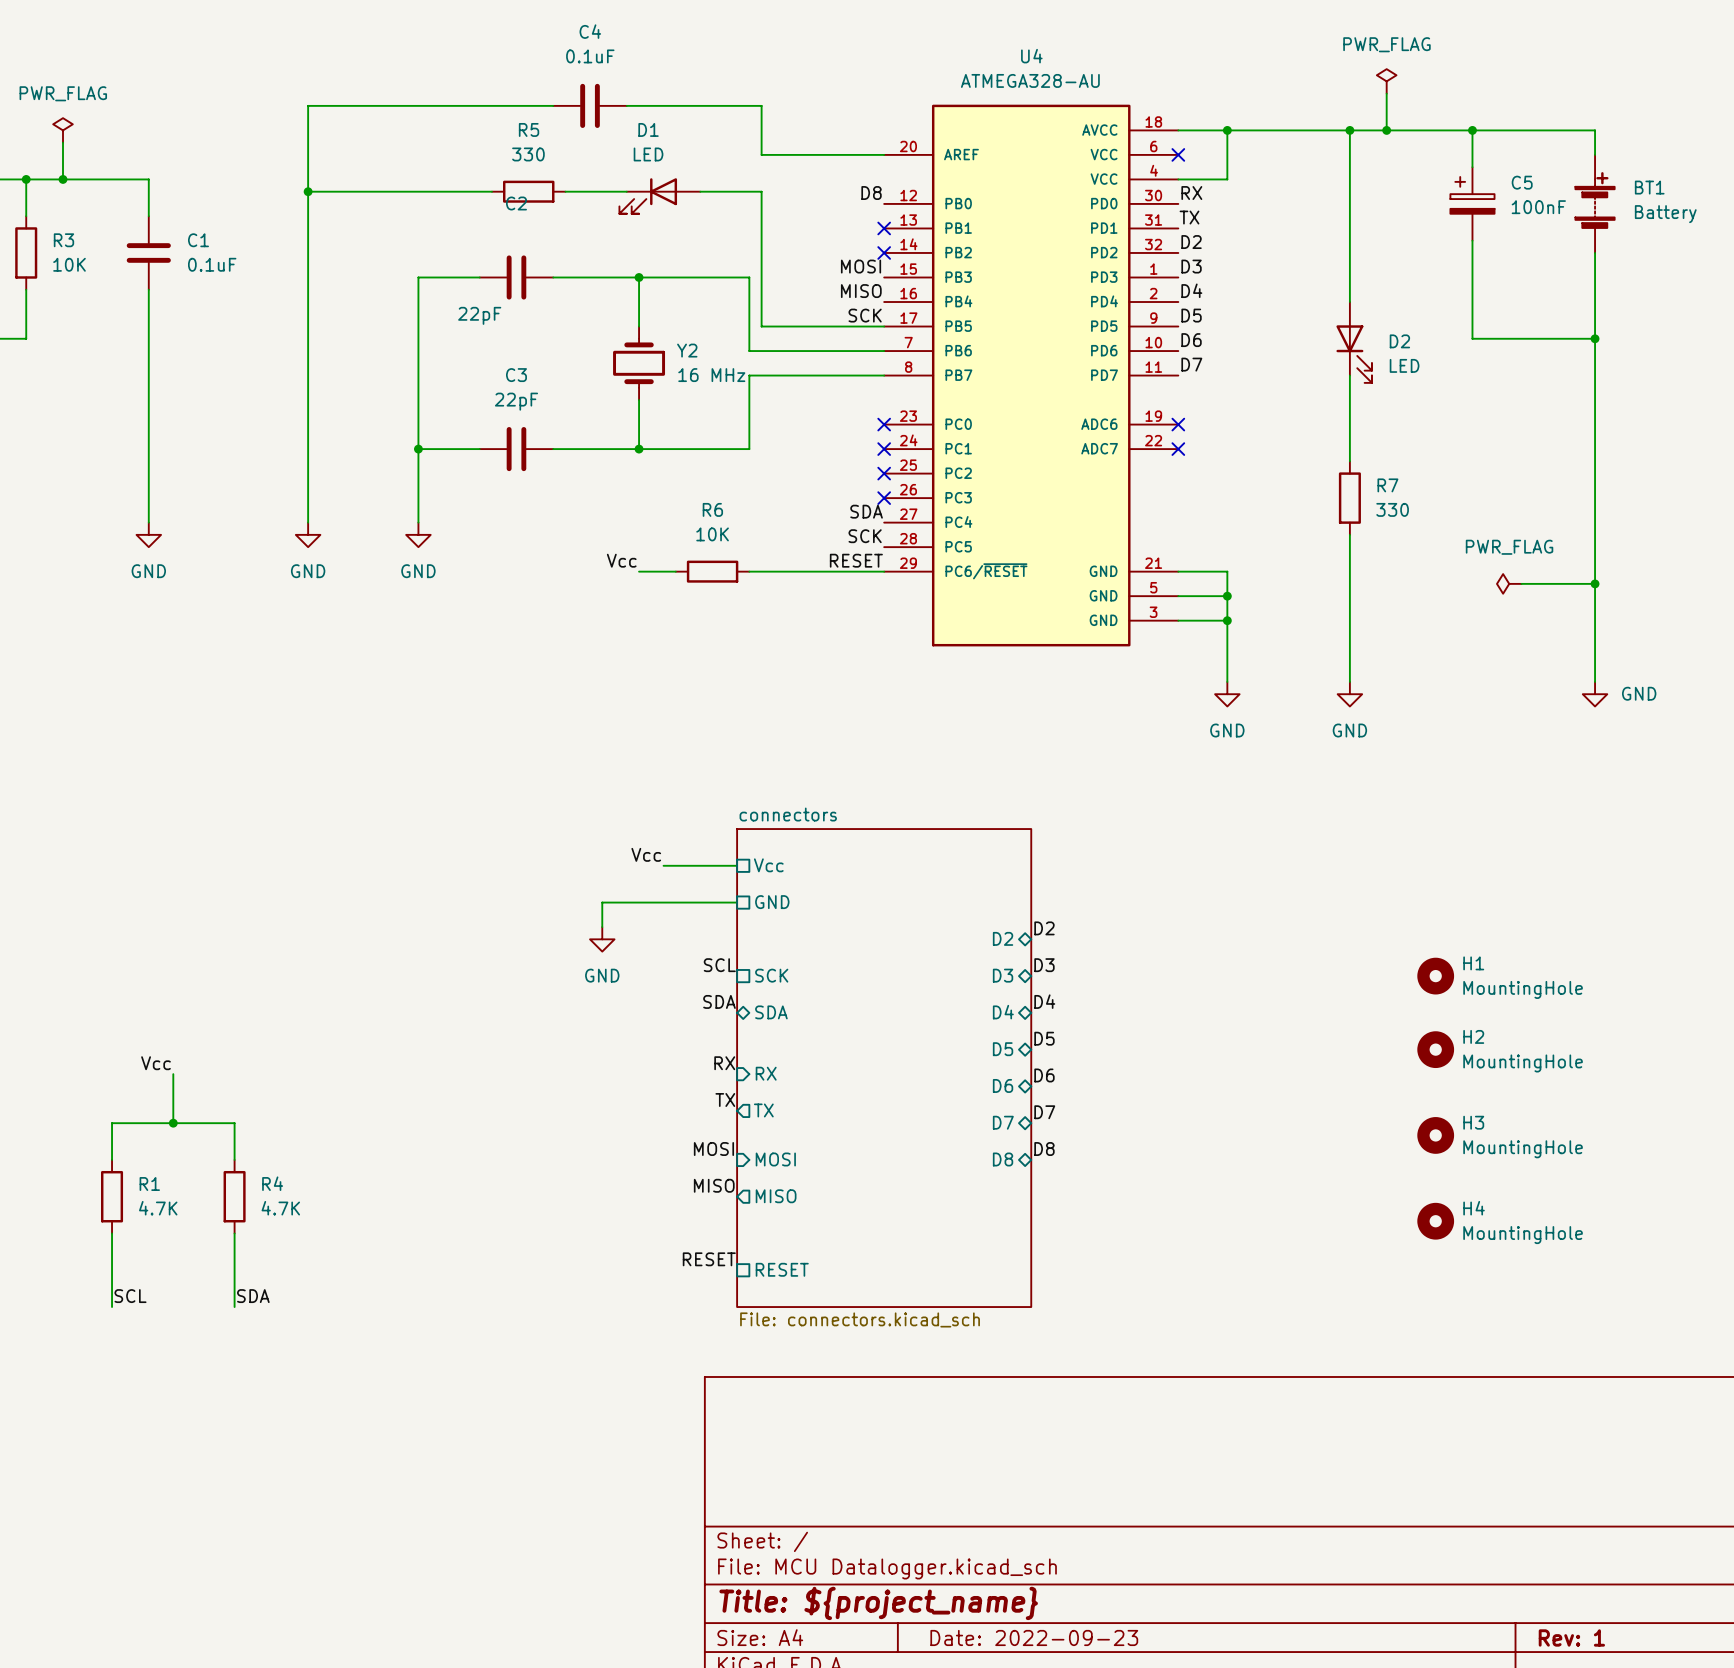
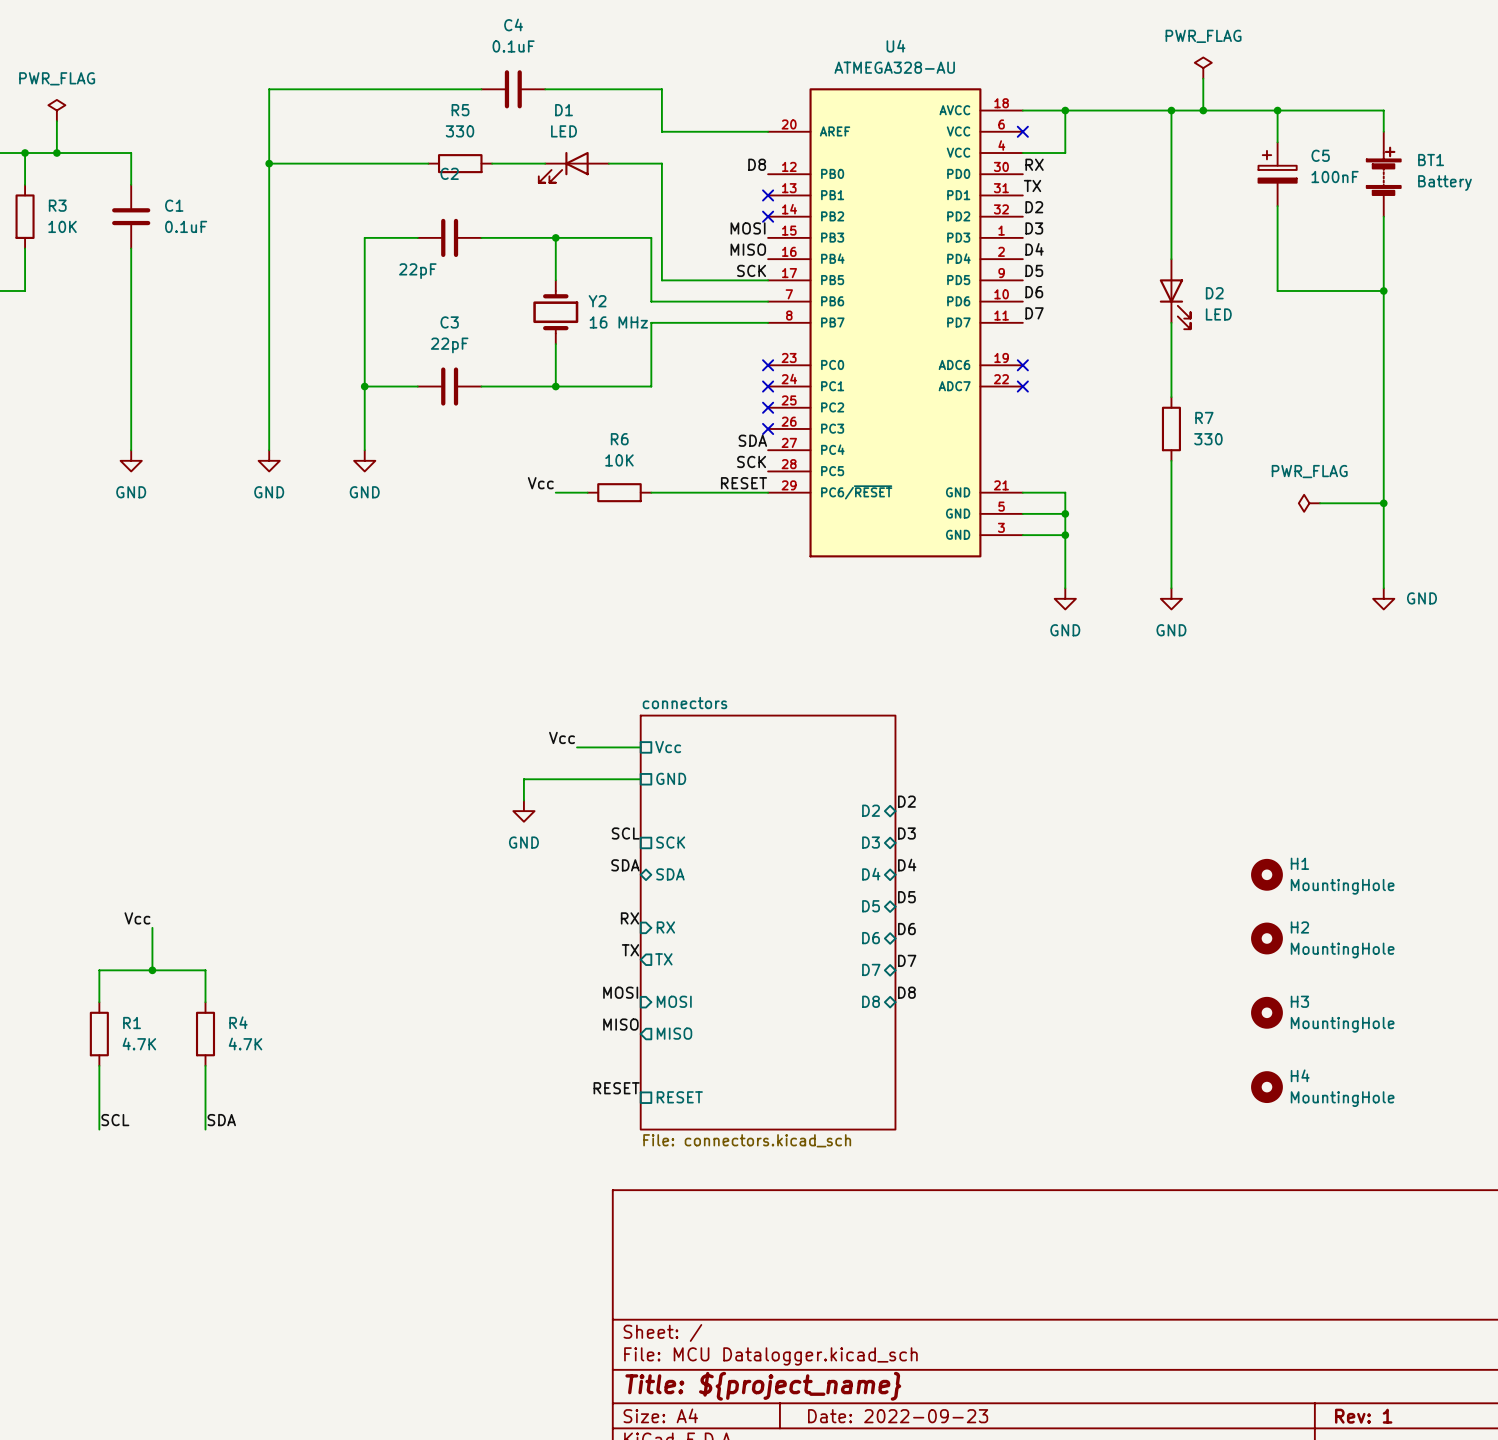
H1 position: (1435, 976) -> (1266, 874)
H2 position: (1435, 1049) -> (1266, 938)
H3 position: (1435, 1135) -> (1266, 1012)
H4 position: (1435, 1221) -> (1266, 1087)

